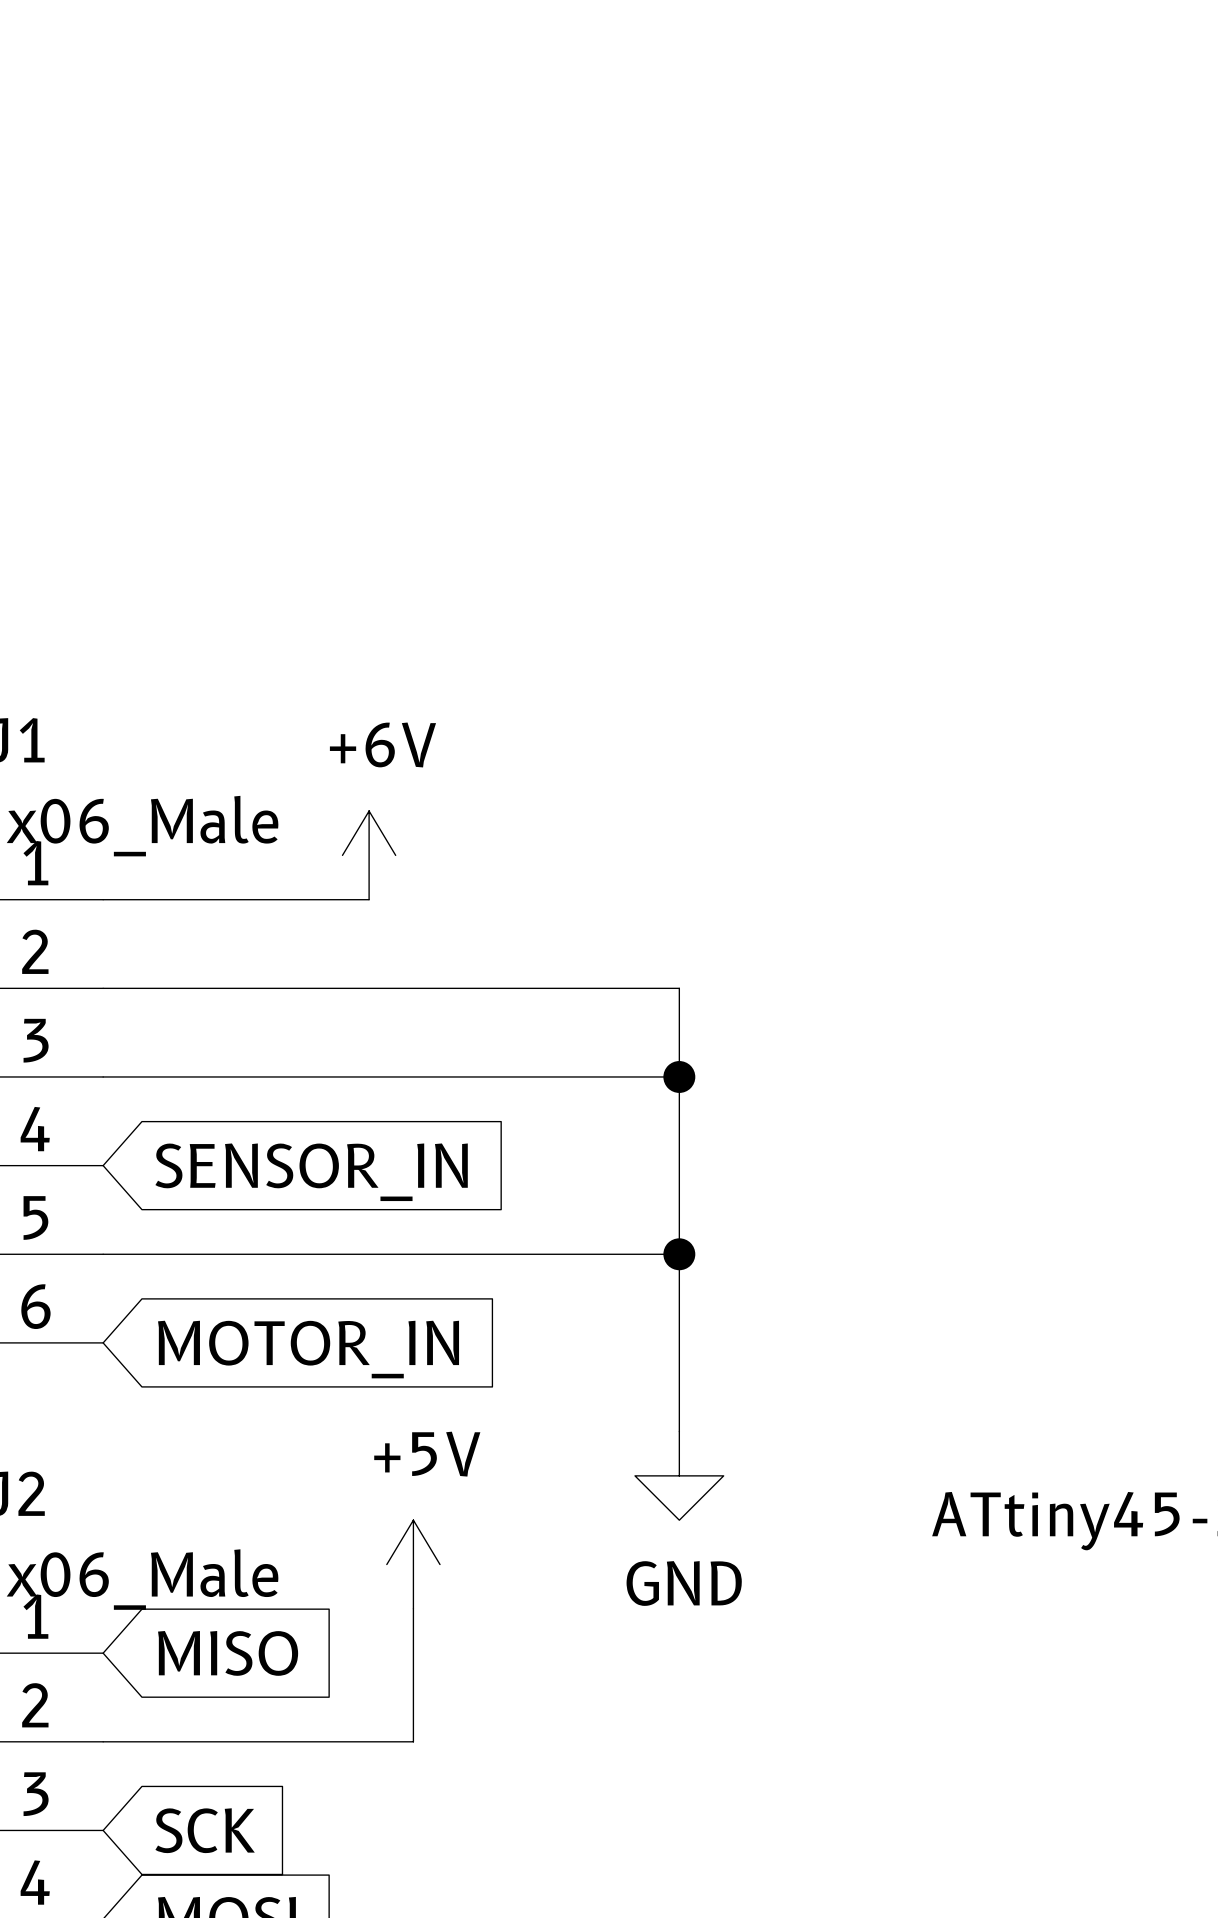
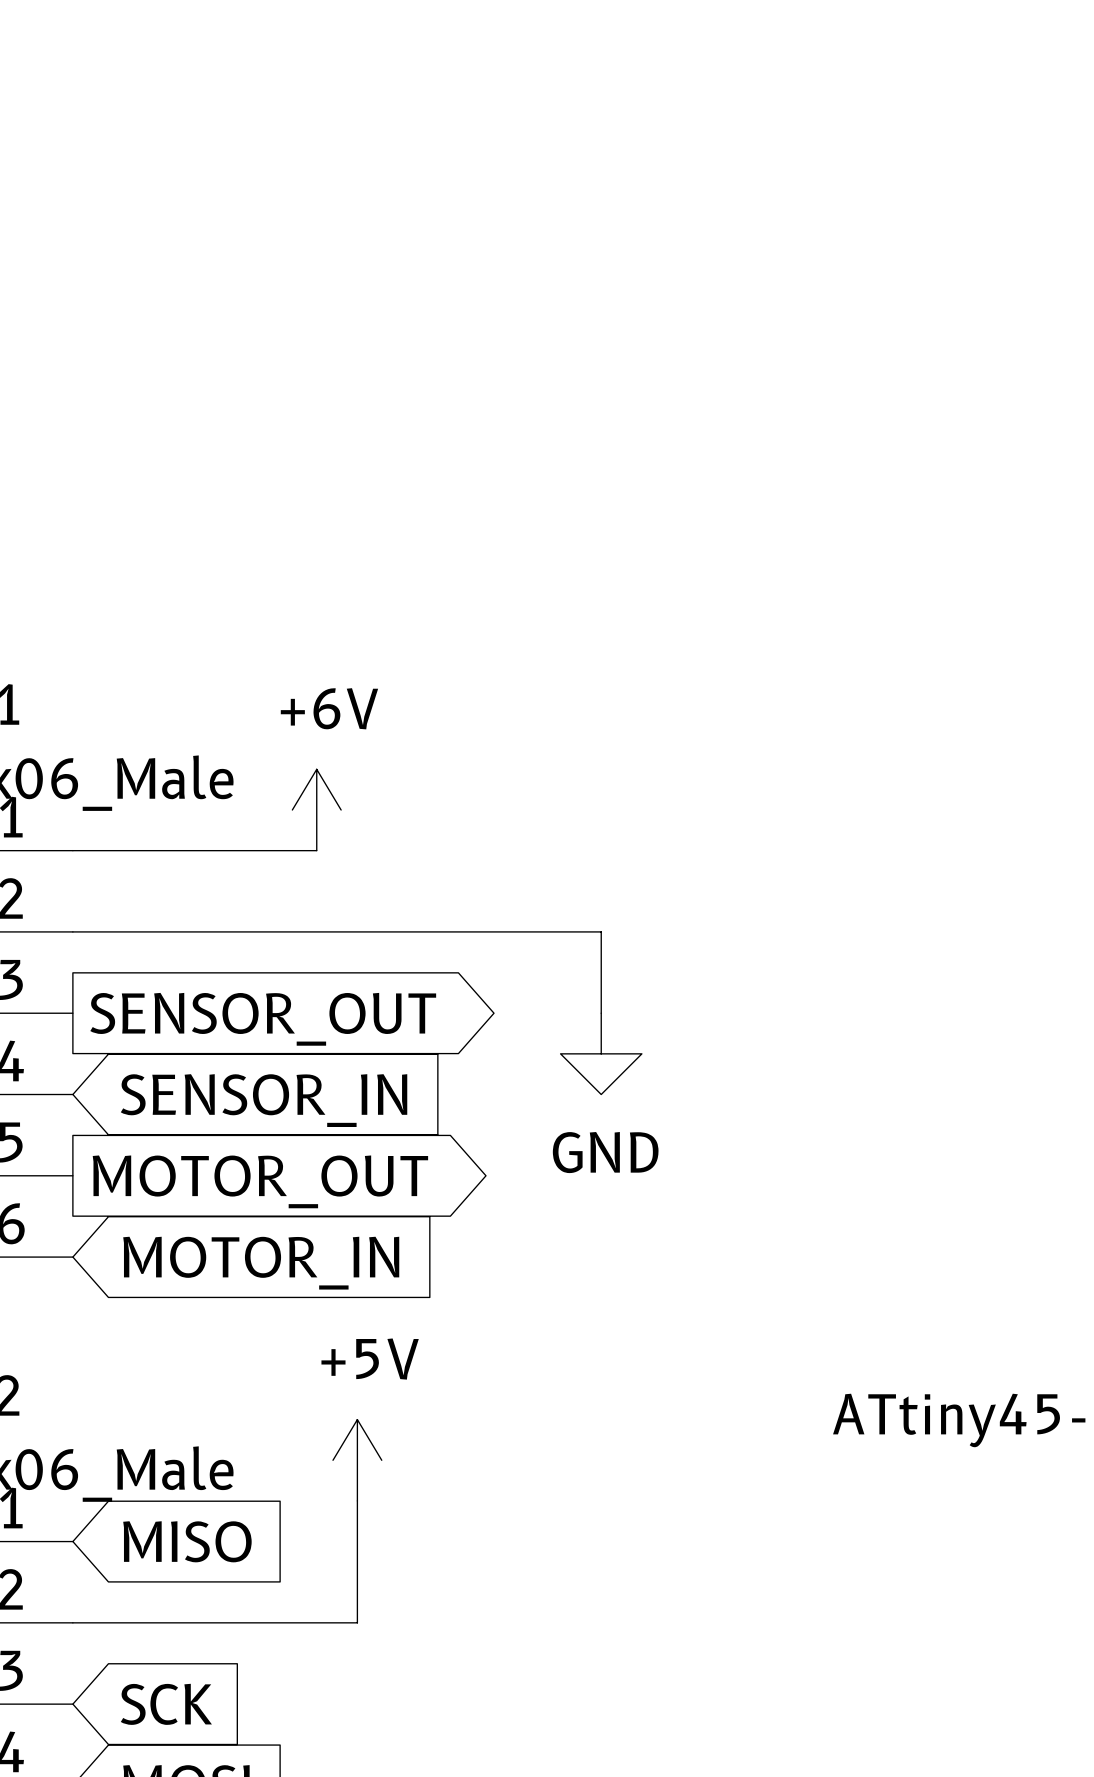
wire: (103, 1076) (679, 1076) (679, 1431) -> none
junction: (679, 1076) -> none
global label: none -> SENSOR_OUT (263, 1019)
wire: (103, 1254) (679, 1254) -> none
junction: (679, 1254) -> none
global label: none -> MOTOR_OUT (260, 1181)
power symbol position: GND (679, 1475) -> GND (601, 1053)

